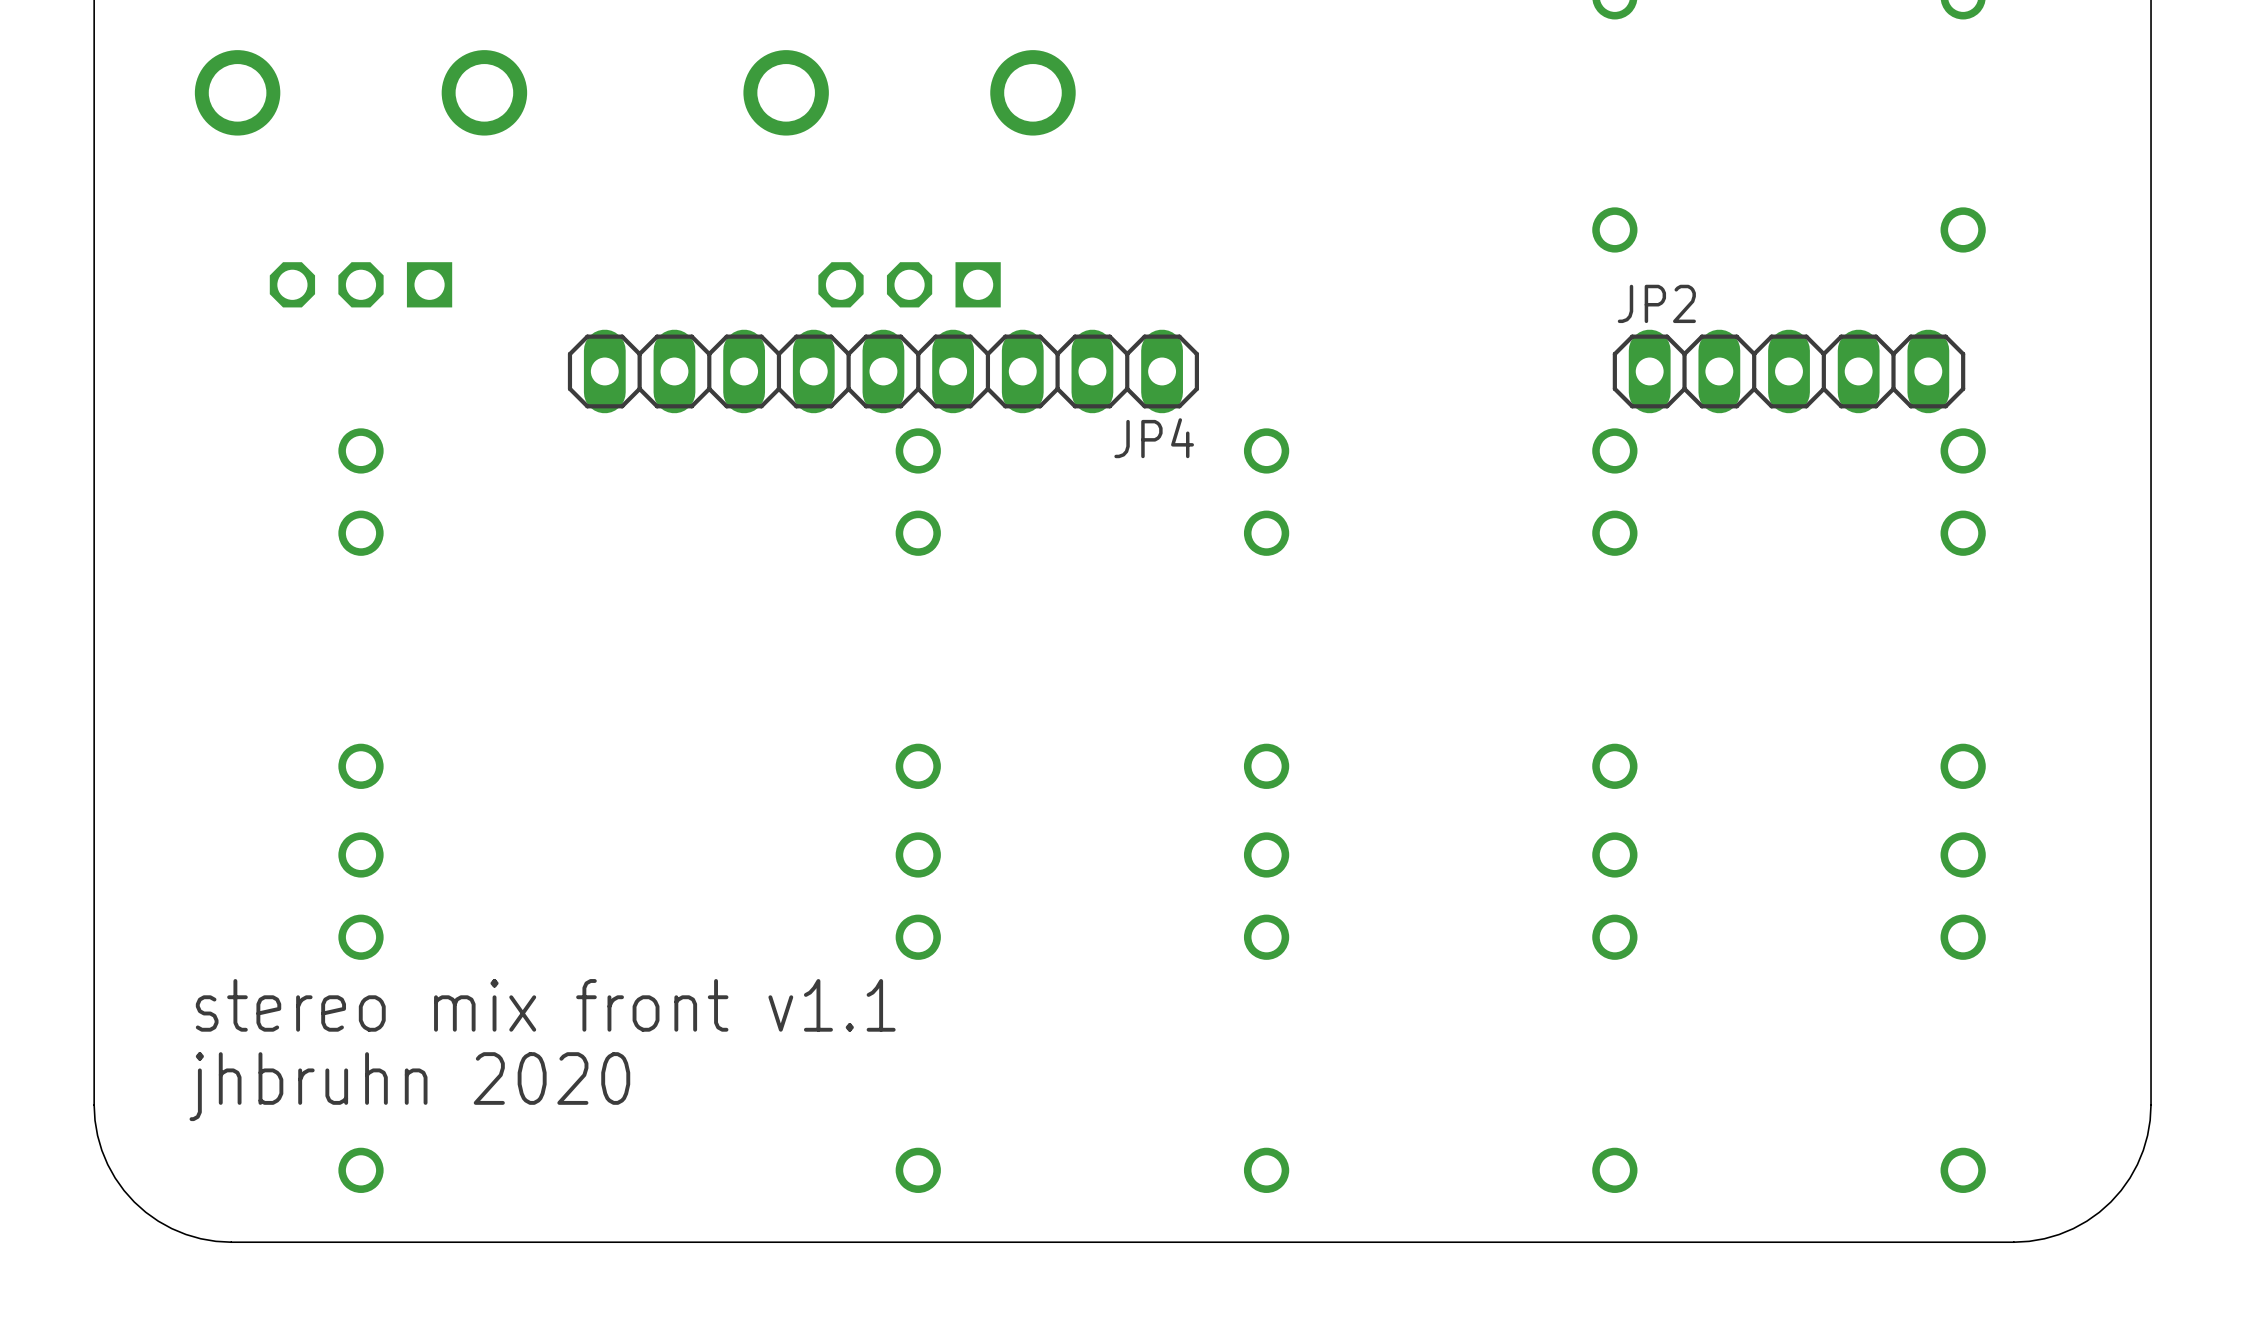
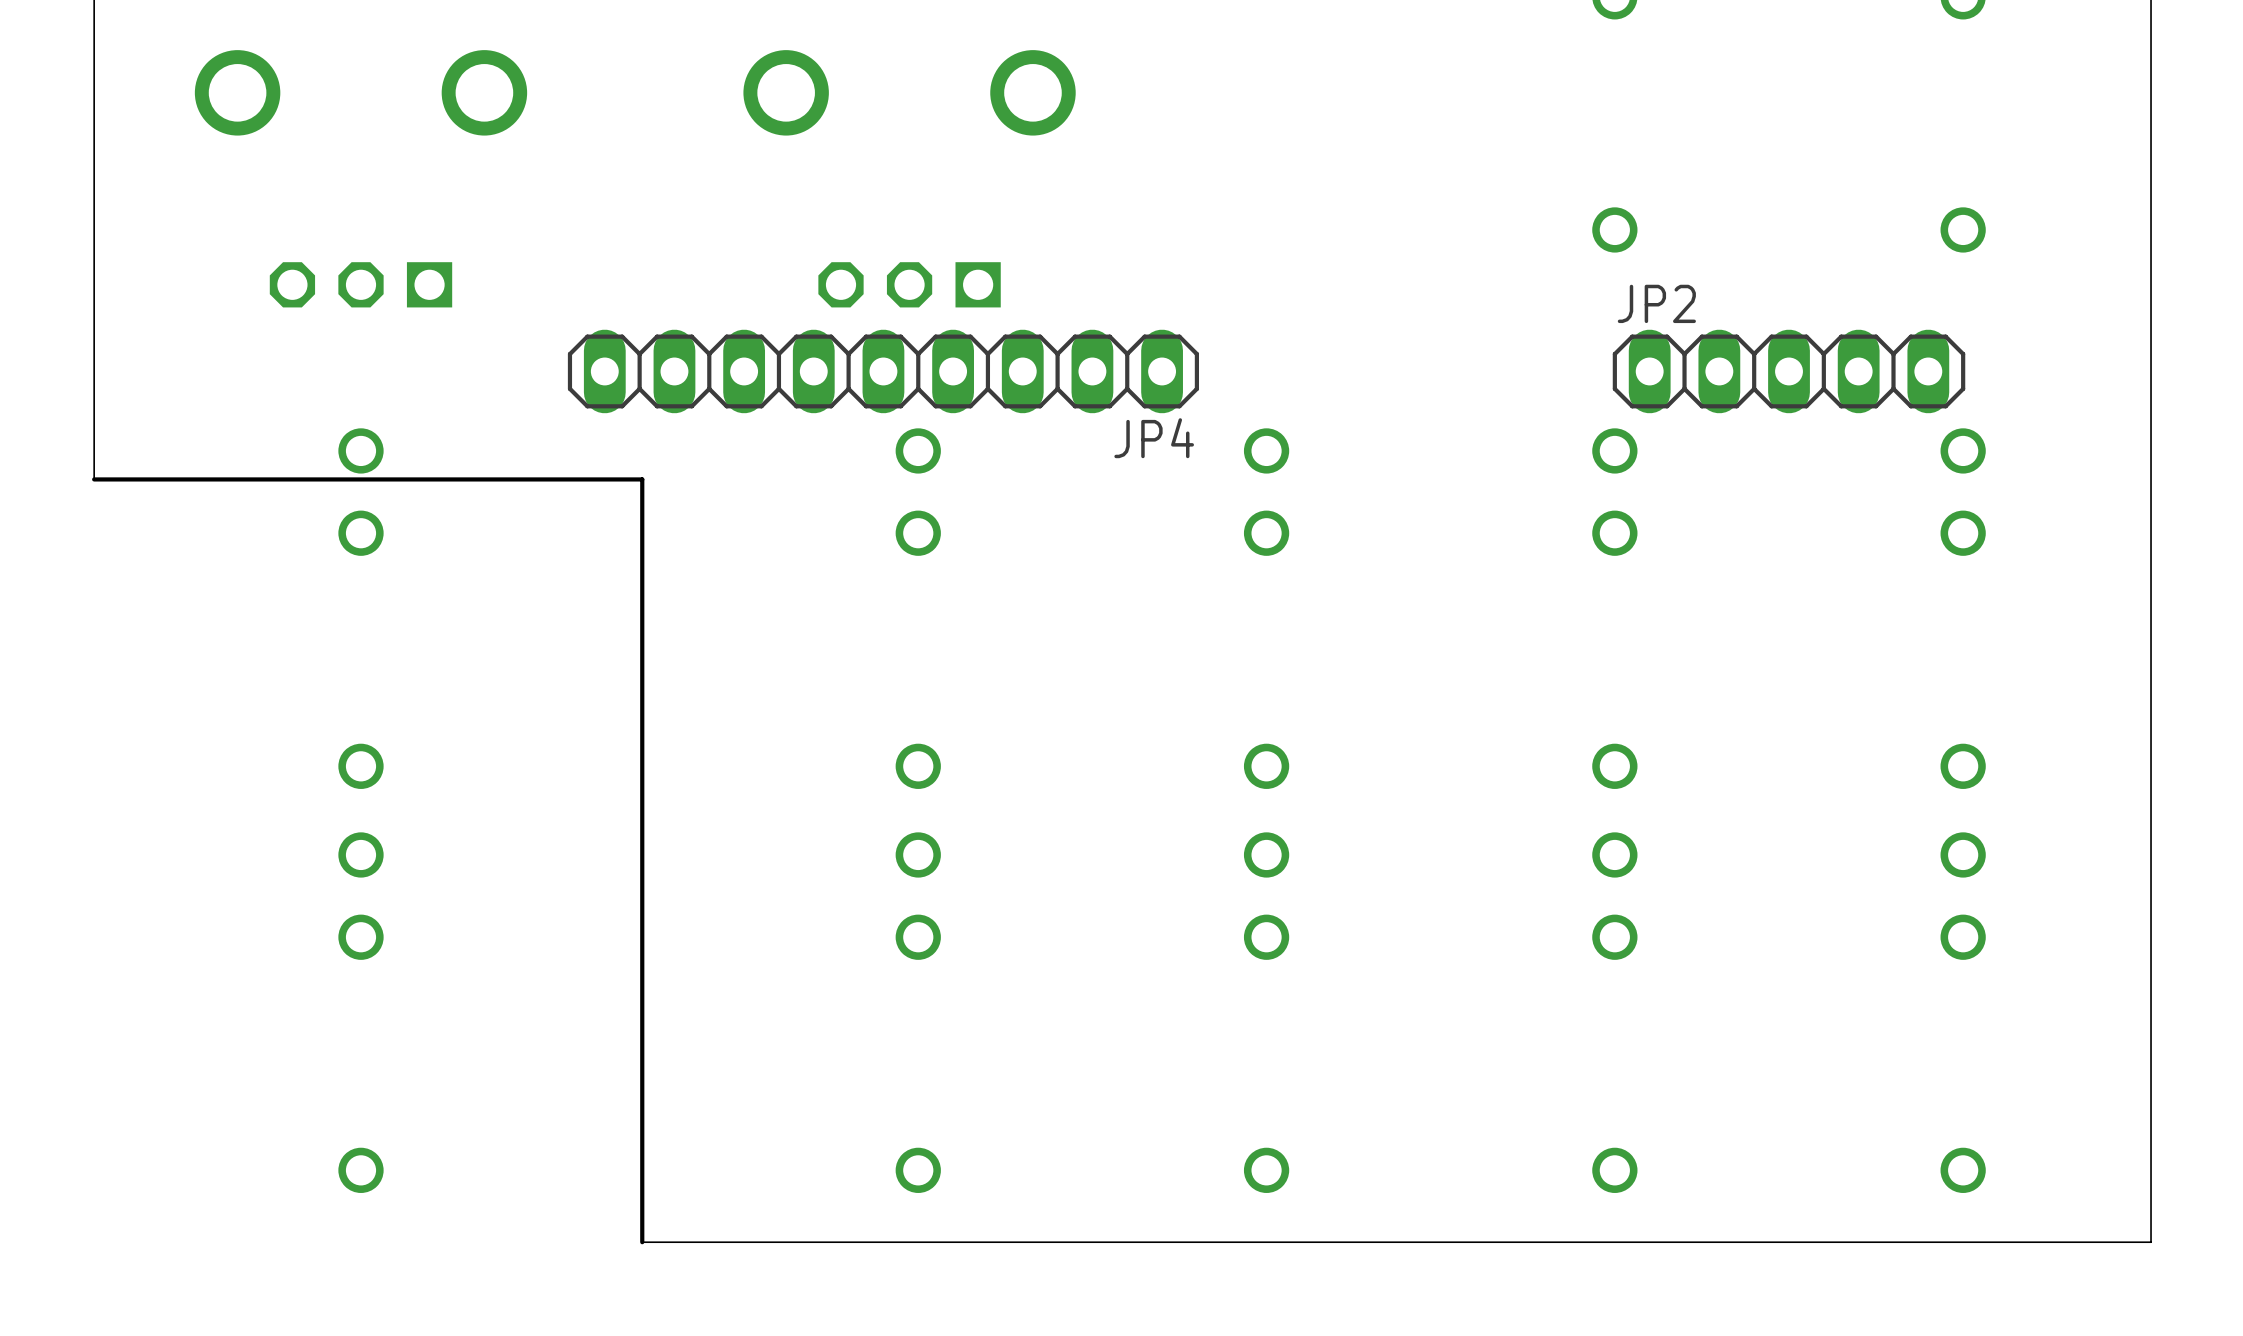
board edge: (94, 479) (94, 1105) (95, 1120) (101, 1150) (115, 1178) (124, 1190) (145, 1212) (158, 1221) (185, 1234) (215, 1241) (642, 1242) -> (94, 479) (642, 479) (642, 1242)
text: stereo mix front v1.1 (545, 1005) -> none
text: jhbruhn 2020 (409, 1086) -> none
board edge: (2151, 1105) (2150, 1120) (2143, 1150) (2130, 1178) (2110, 1202) (2086, 1221) (2059, 1234) (2029, 1241) (2013, 1242) -> (2151, 1105) (2151, 1242) (2013, 1242)

